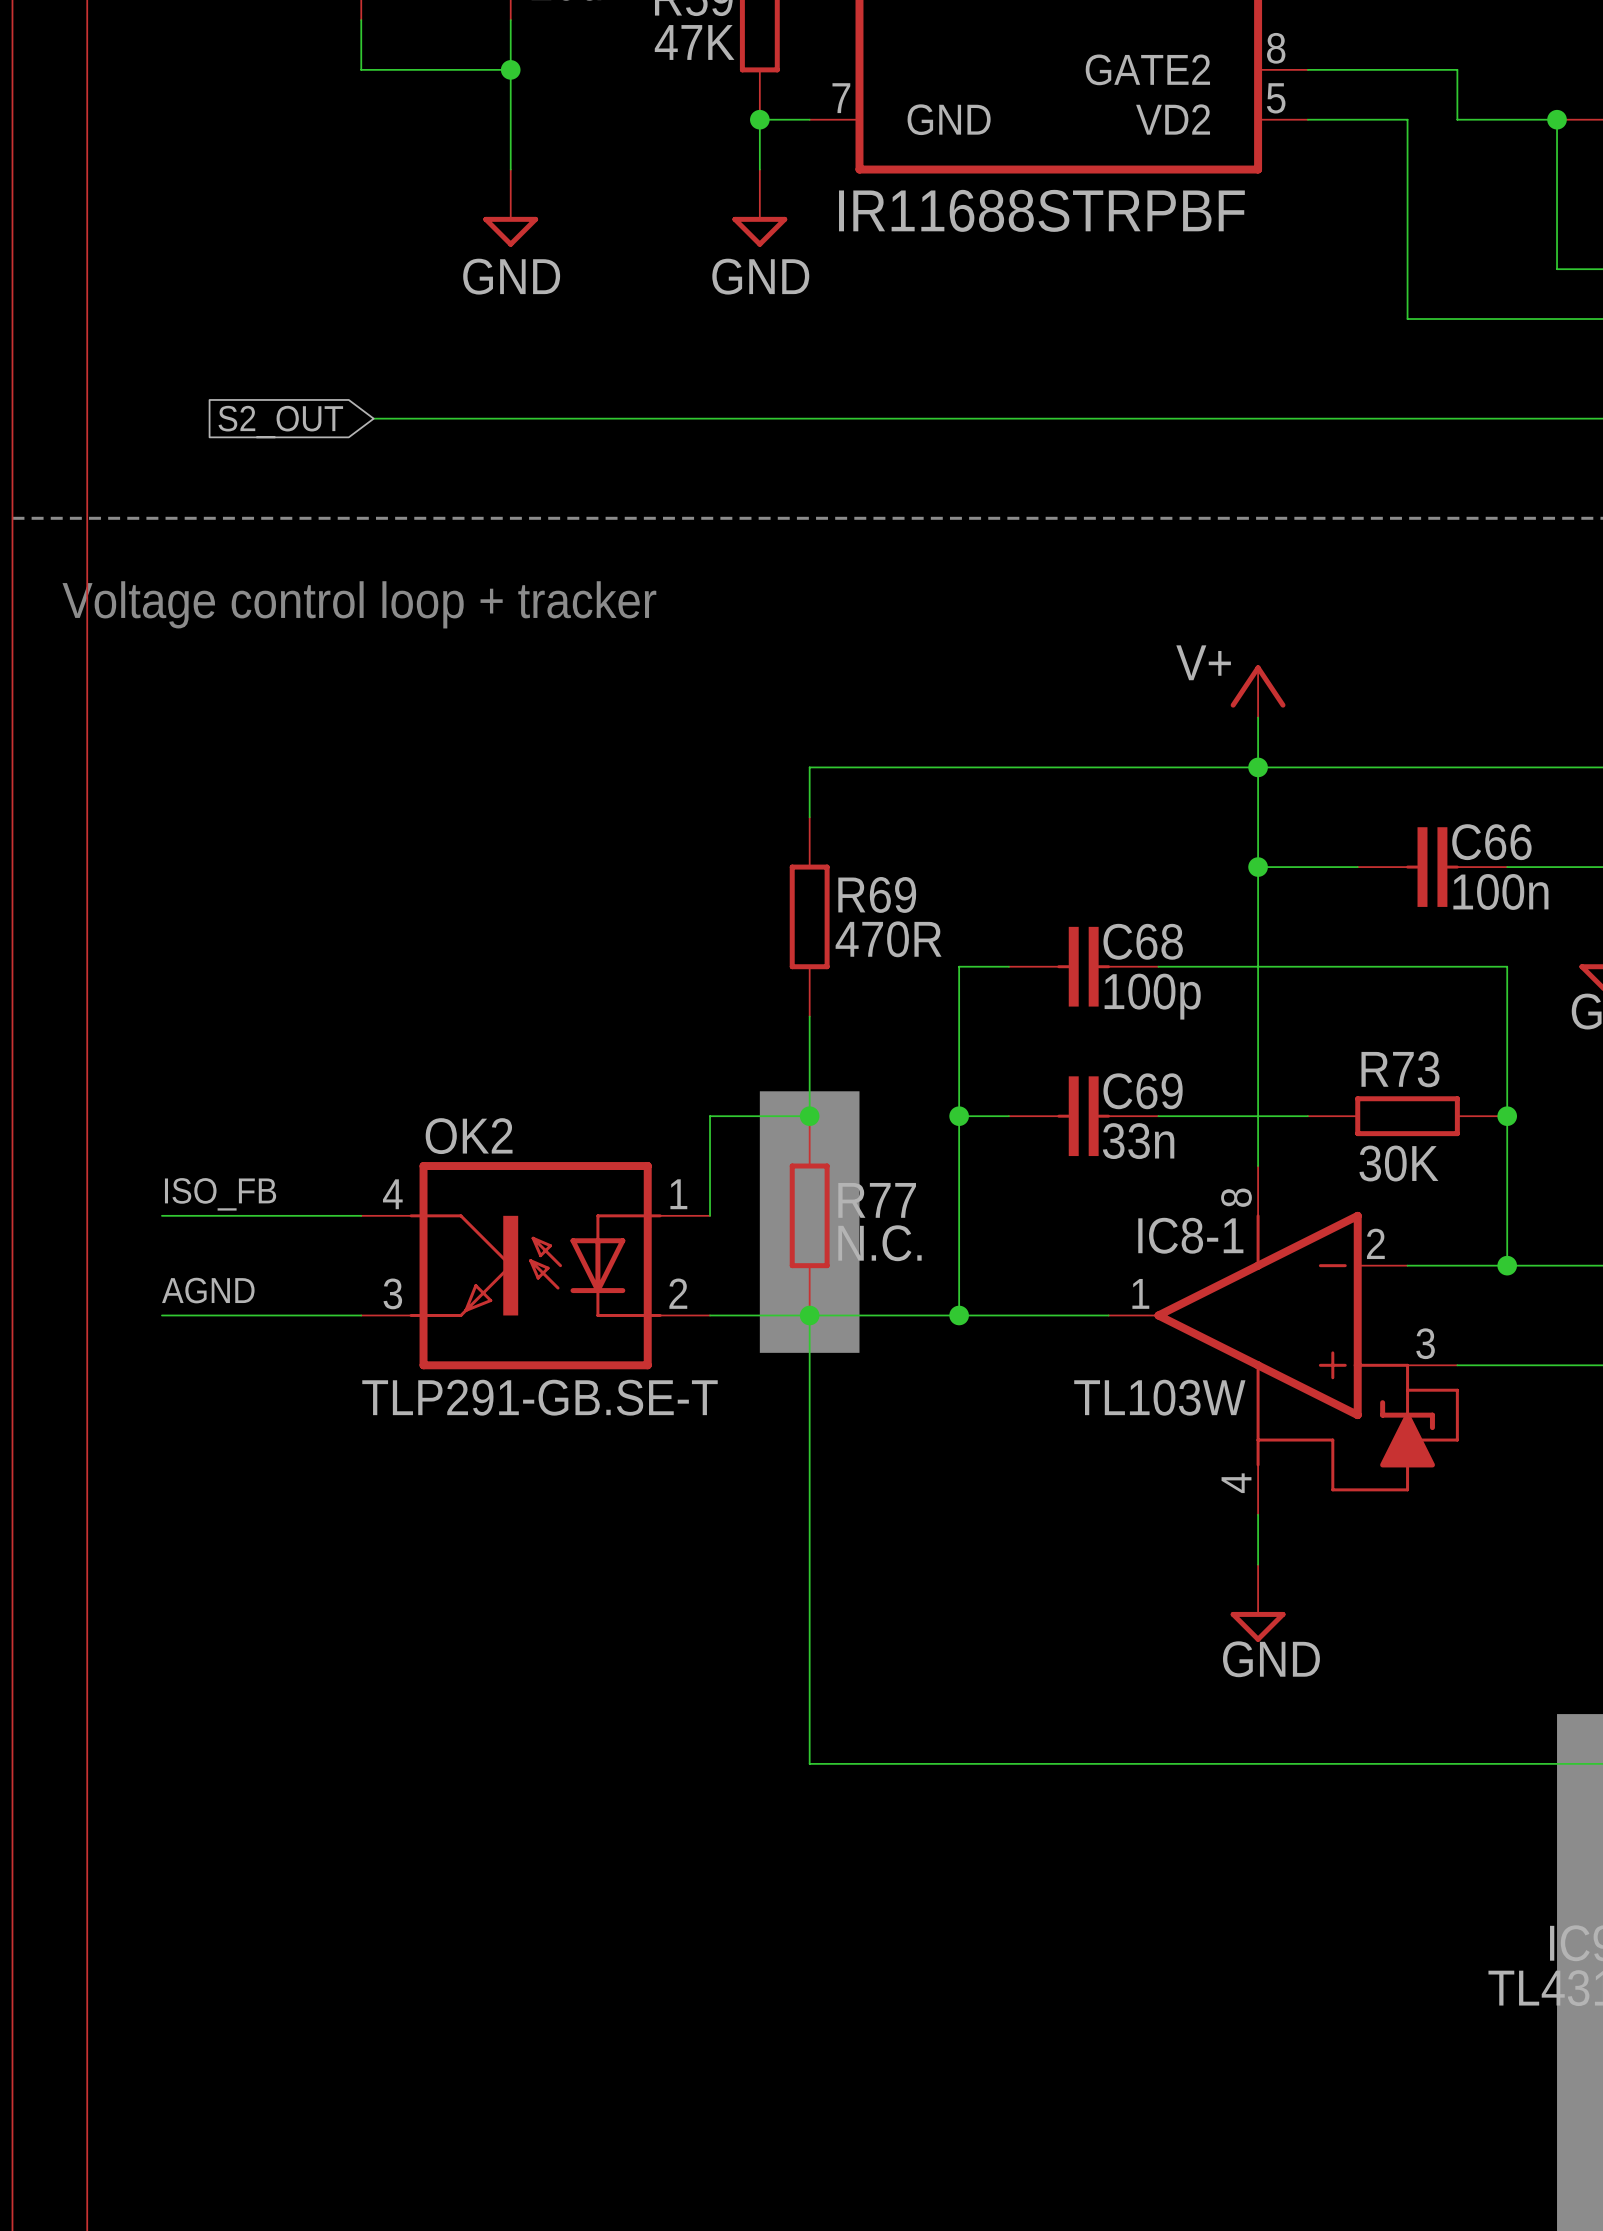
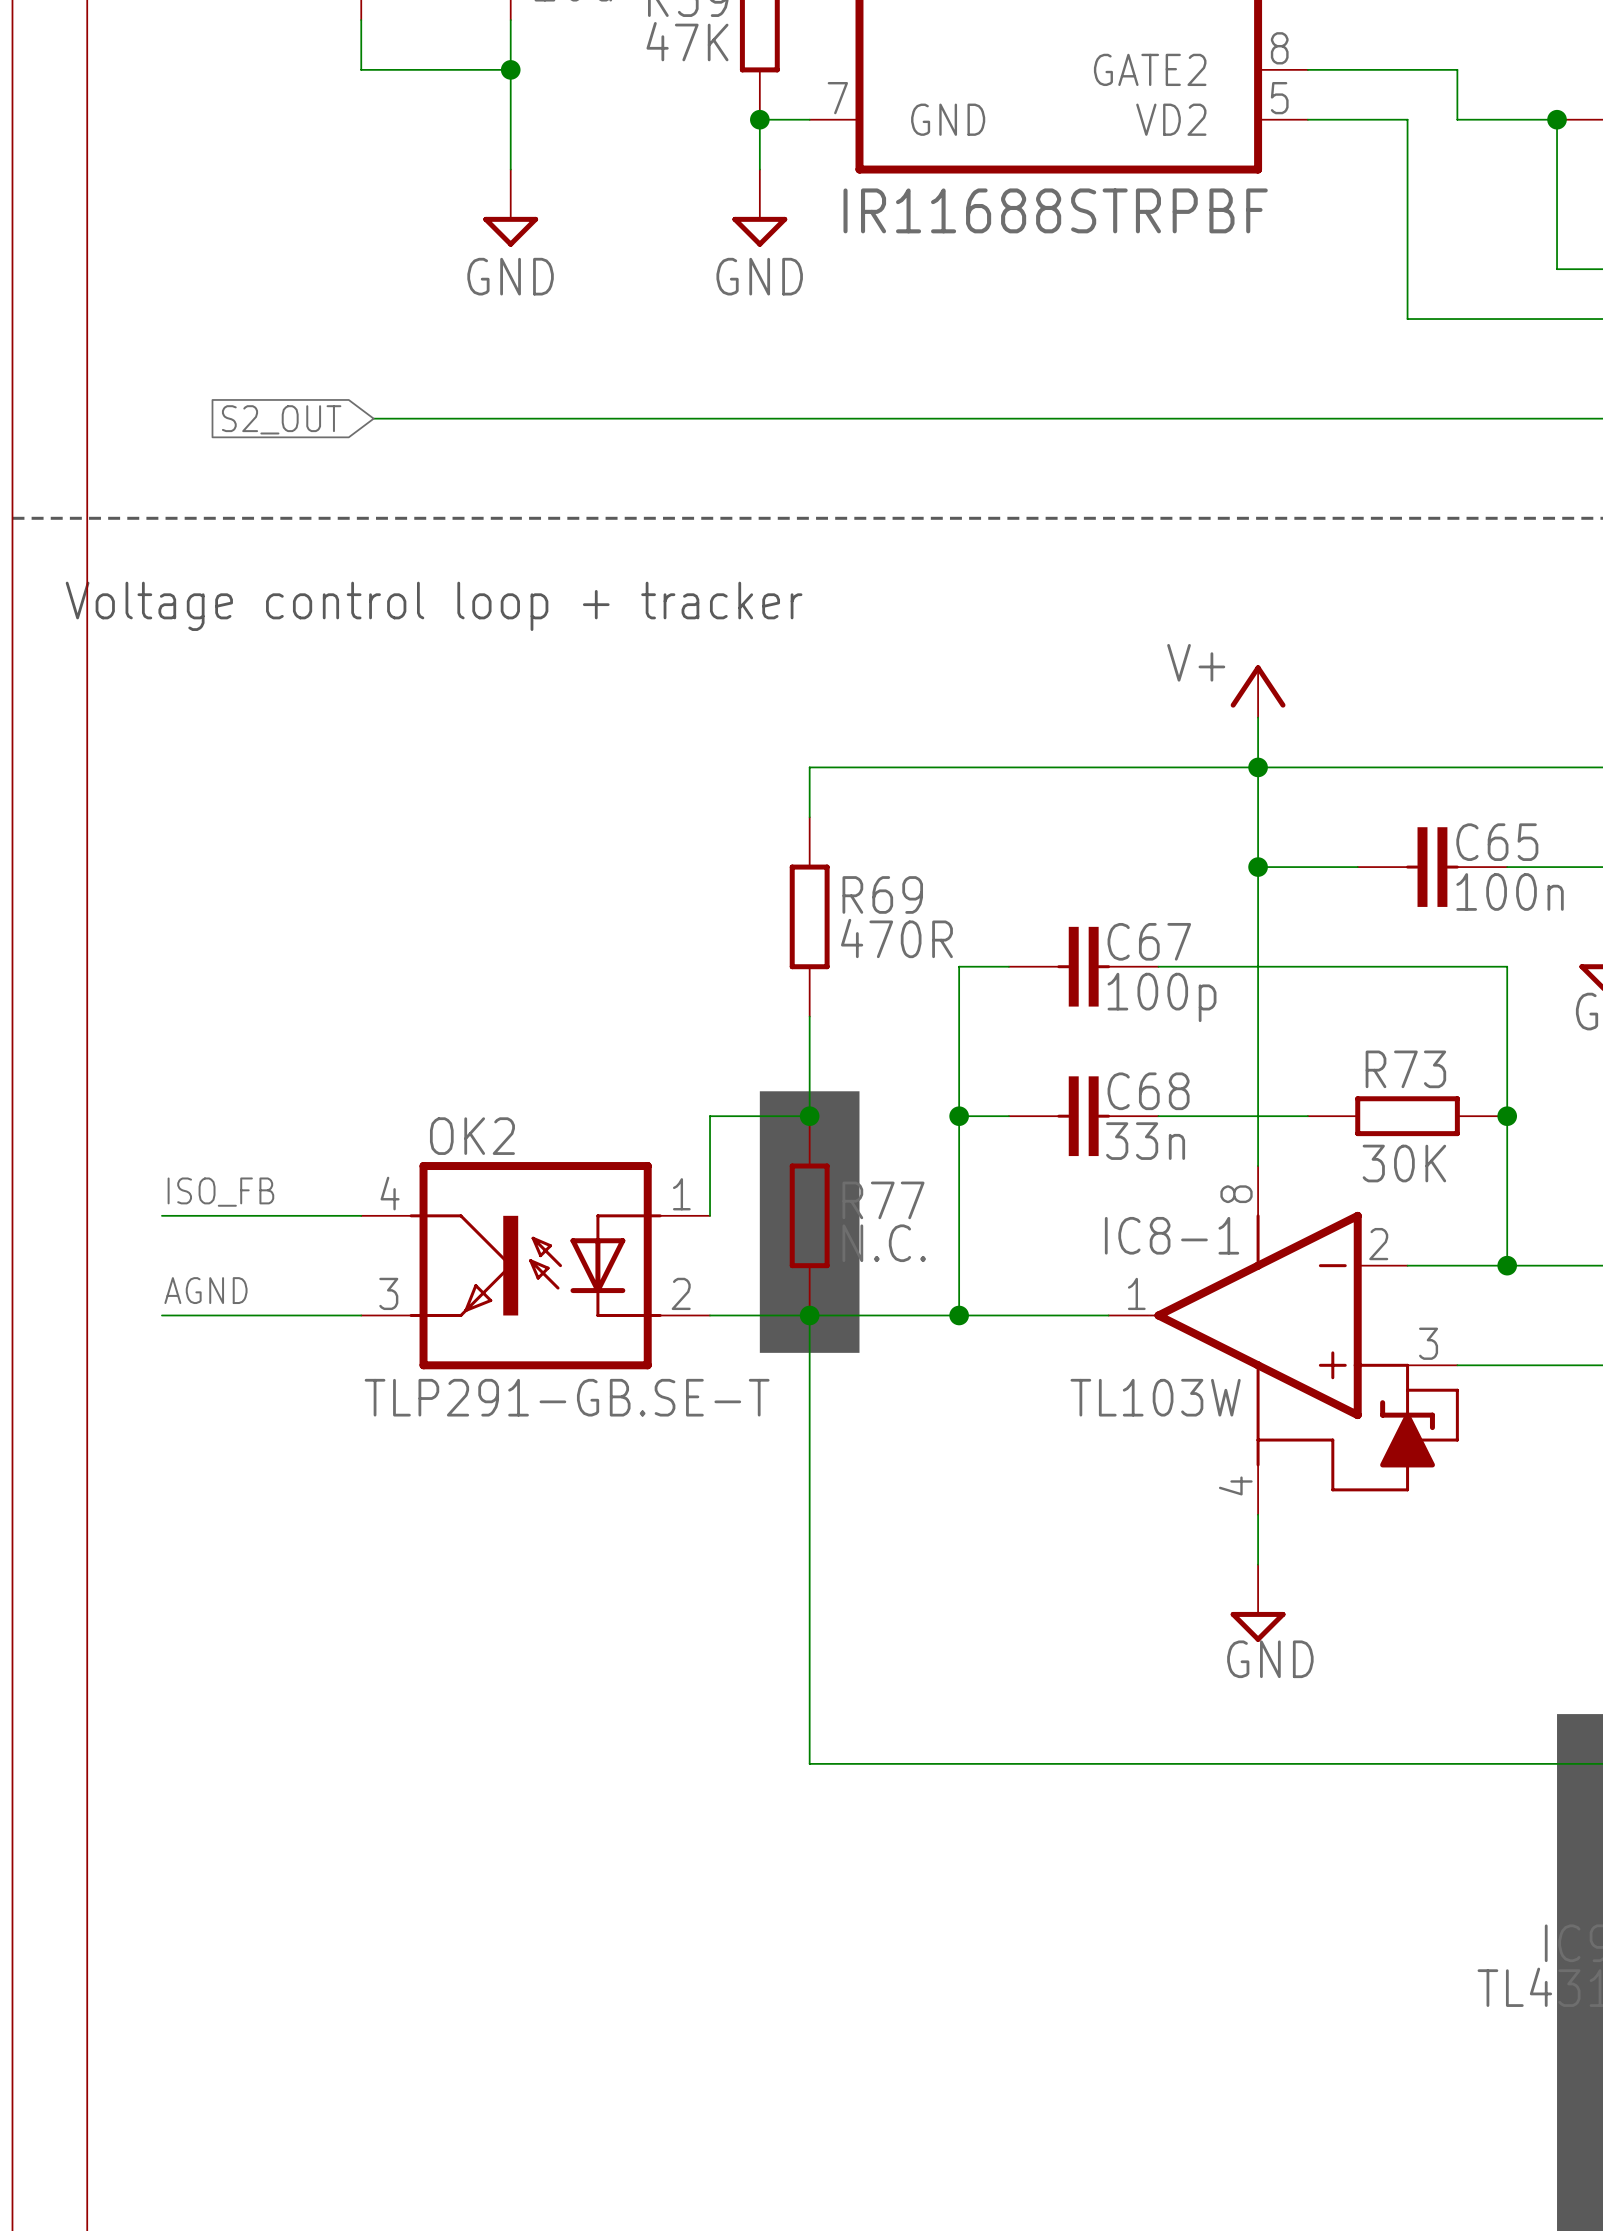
C66 name: C66 (1491, 842) -> C65 (1497, 842)
C68 name: C68 (1143, 941) -> C67 (1149, 941)
C69 name: C69 (1143, 1091) -> C68 (1148, 1091)

